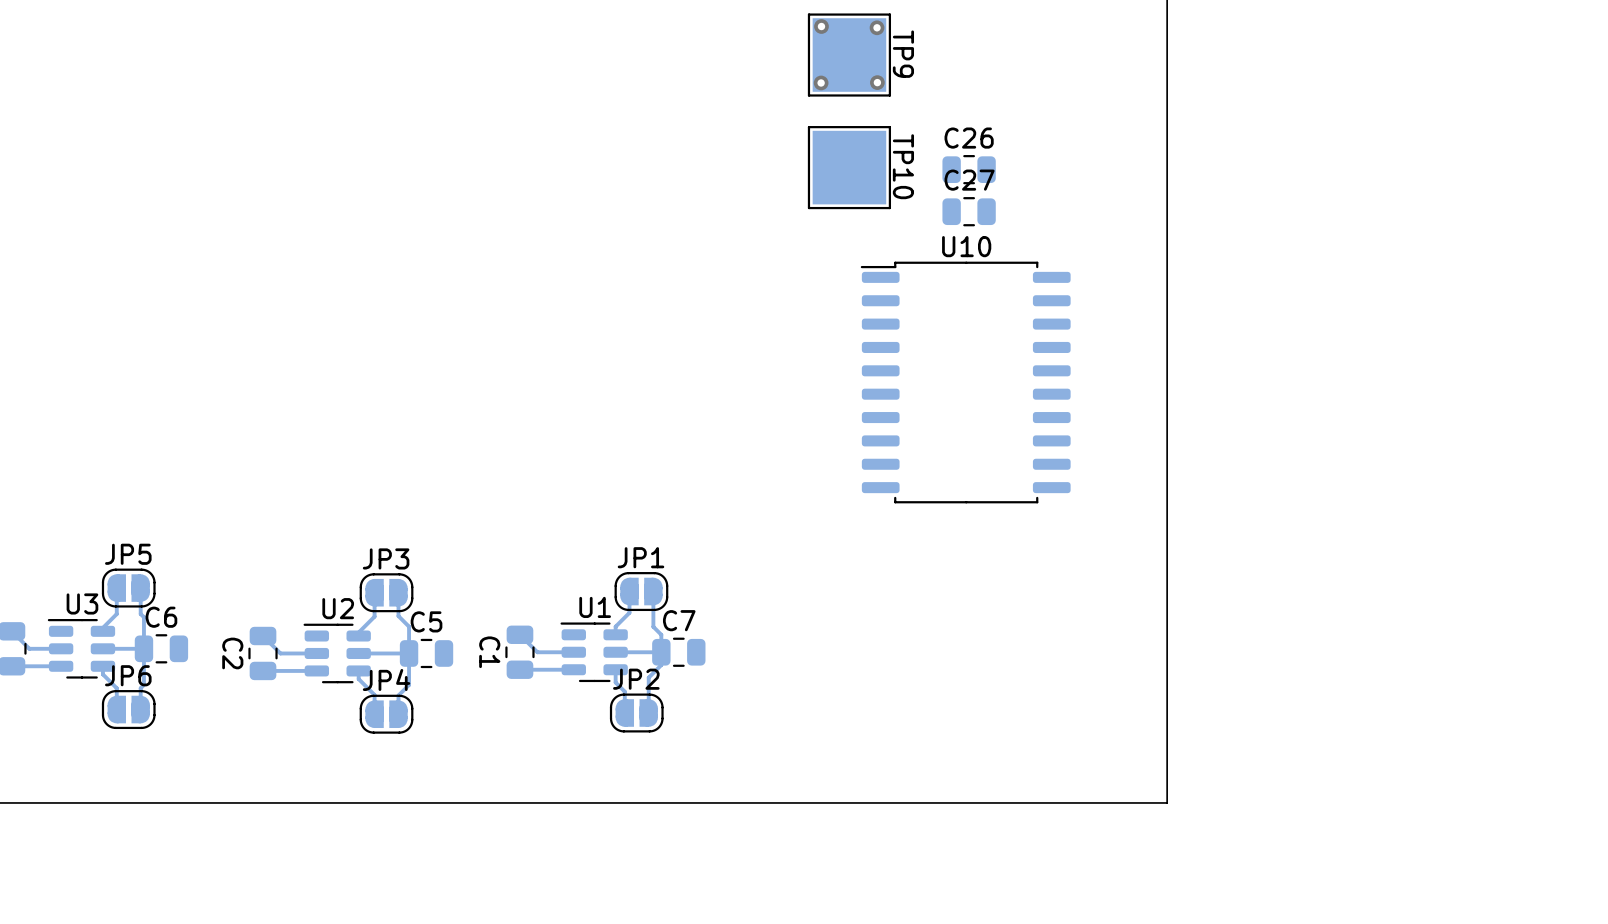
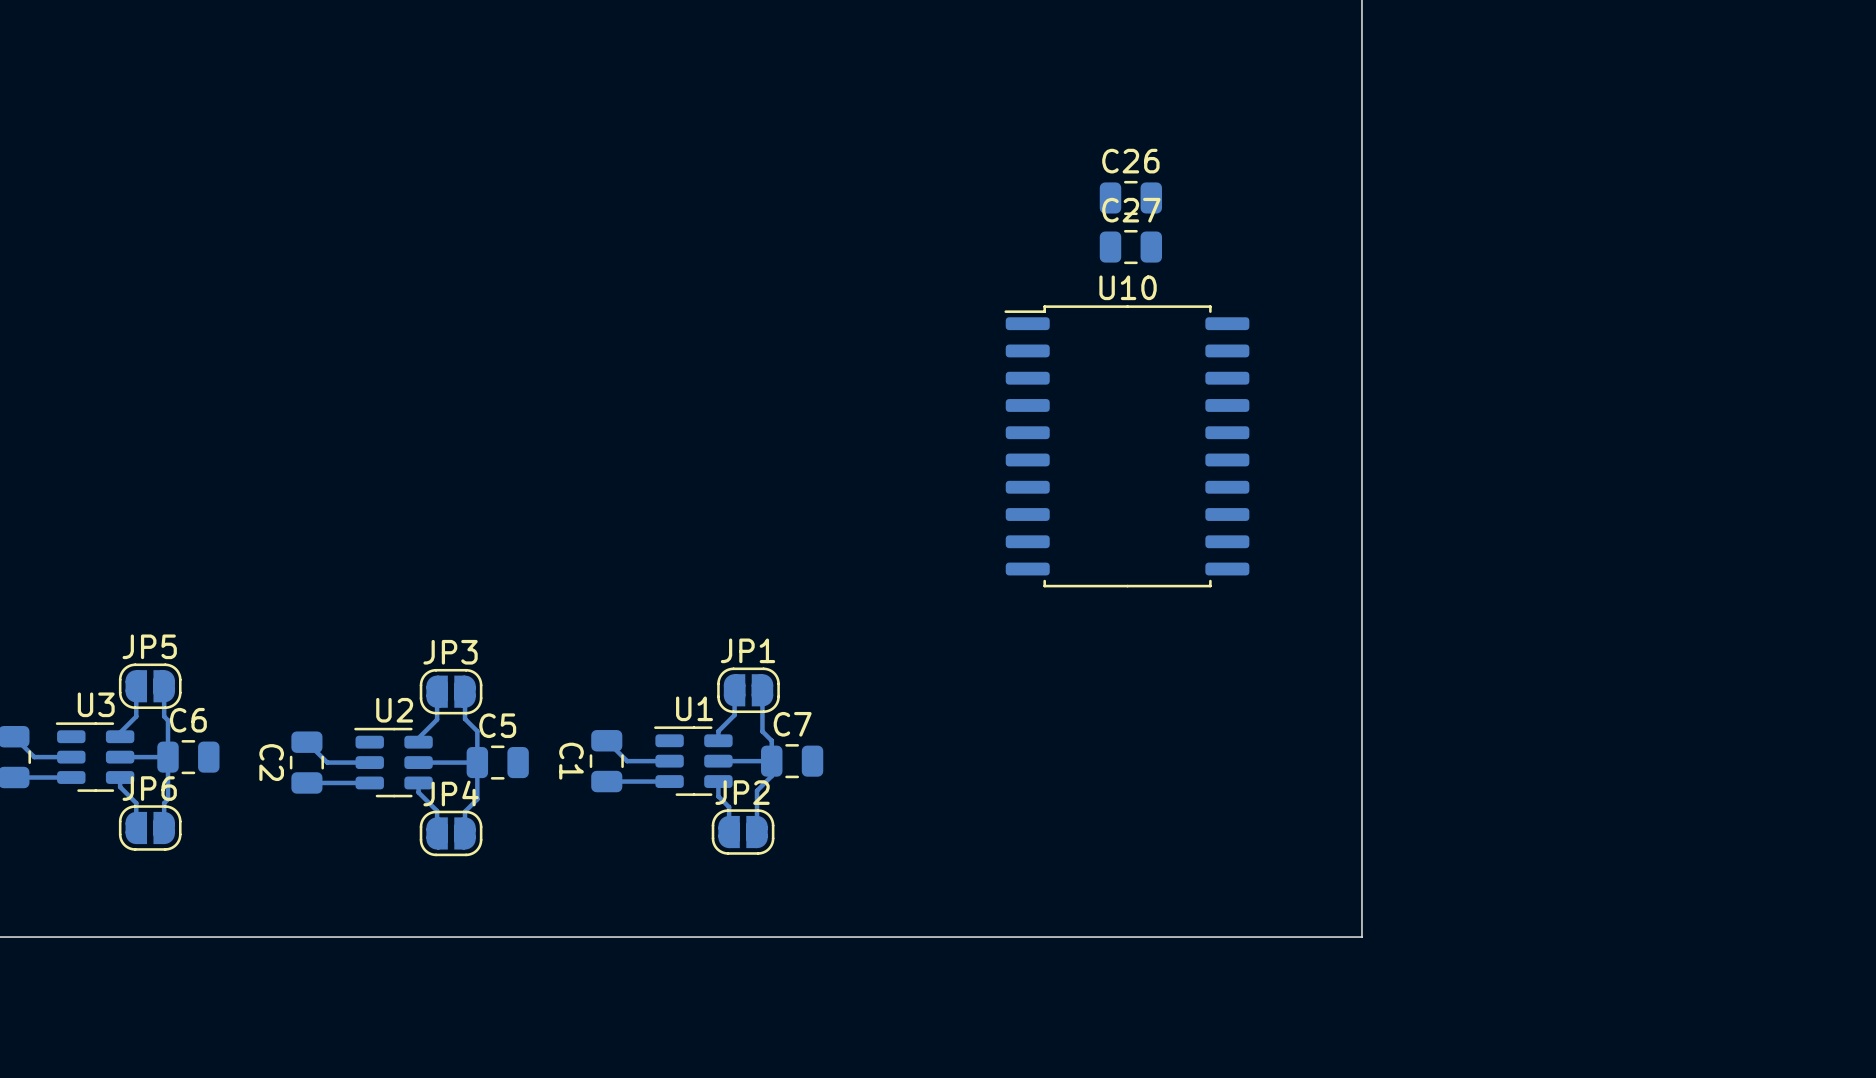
via: (821, 26) -> none
via: (877, 27) -> none
TP9: (849, 55) -> none
via: (821, 82) -> none
via: (877, 82) -> none
TP10: (849, 167) -> none

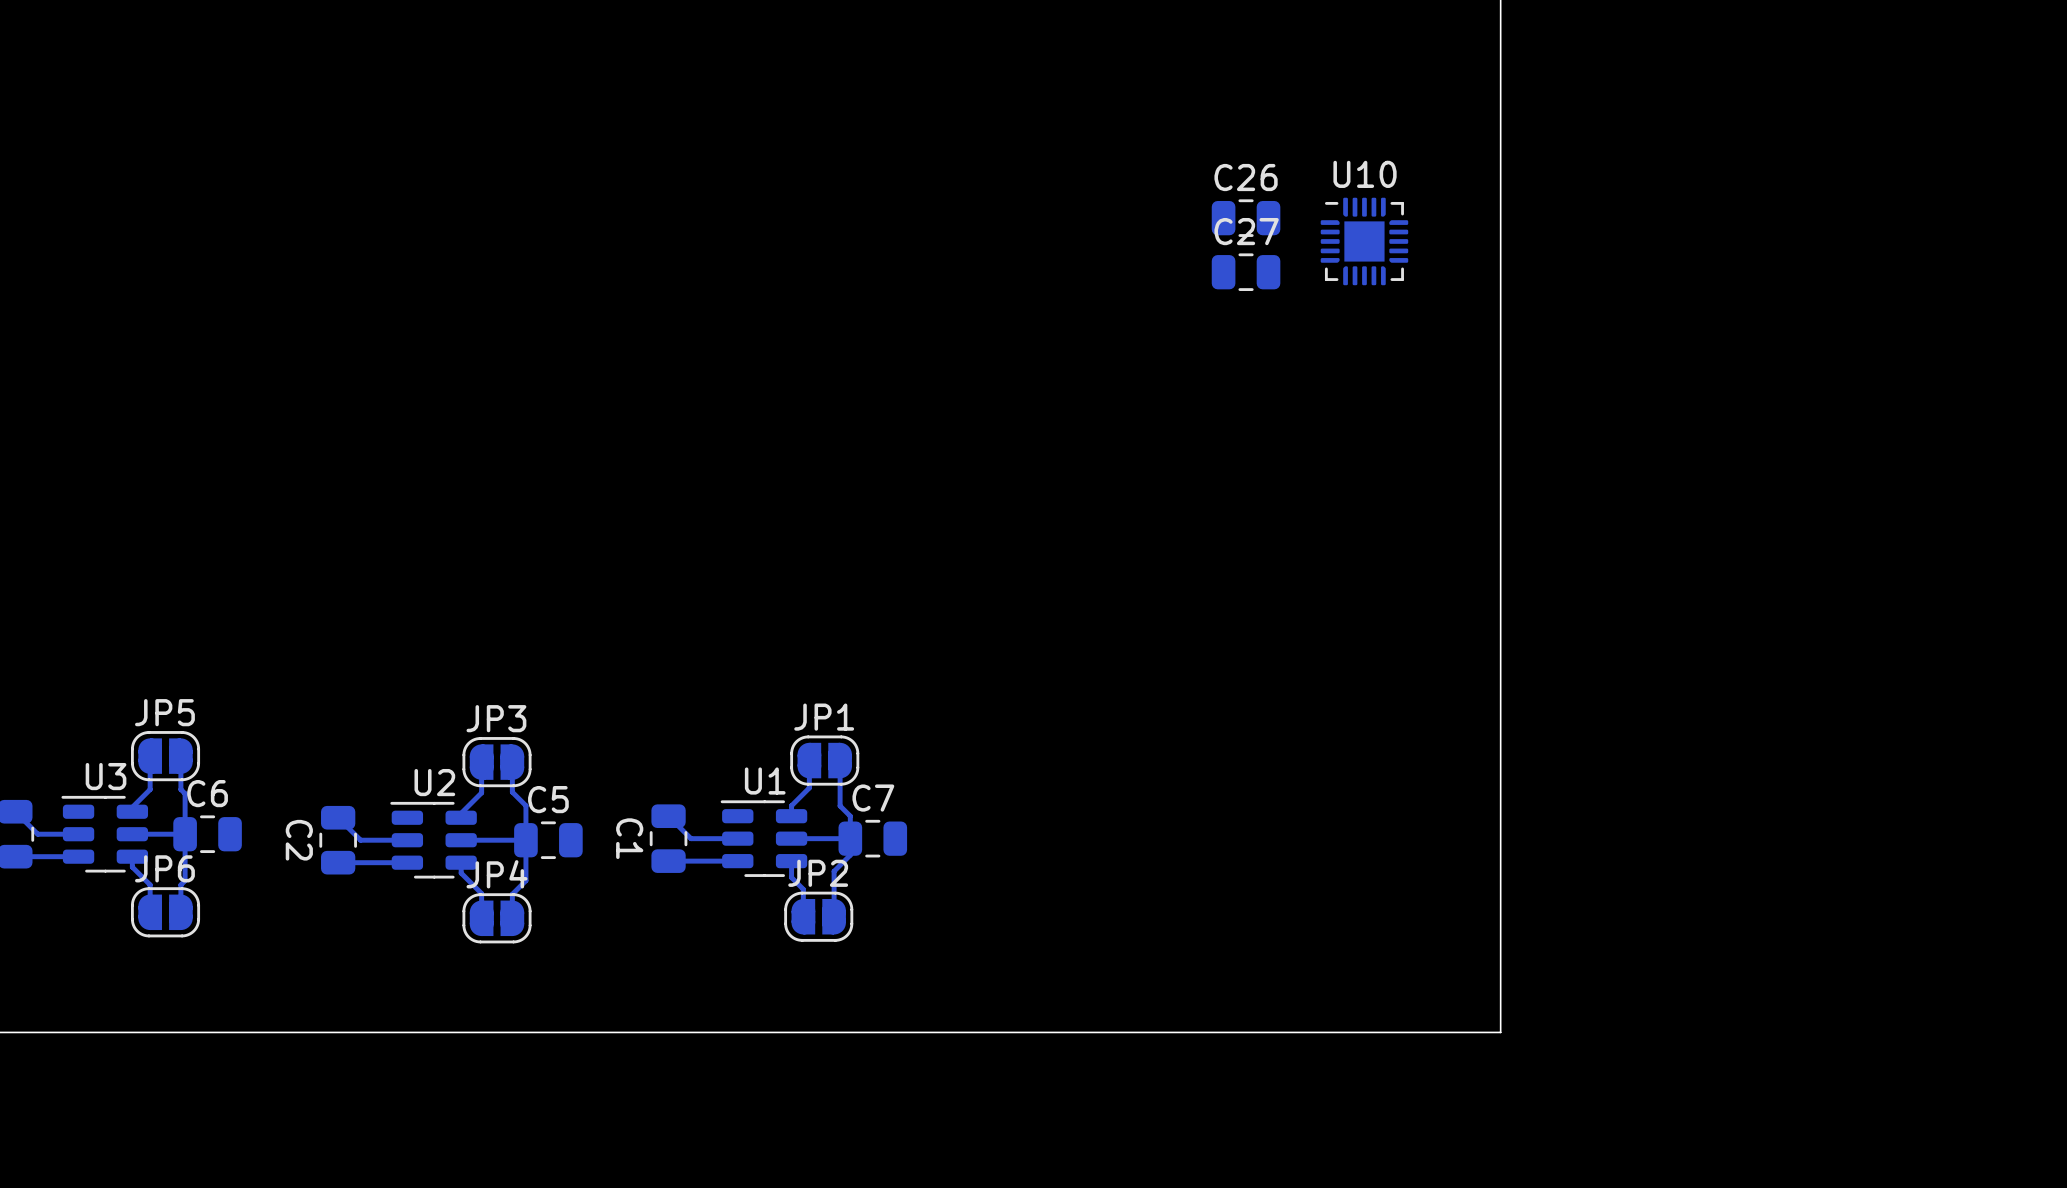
U10 name position: U10 (1128, 287) -> U10 (1365, 174)
U10 footprint: [1004, 305, 1250, 588] -> [1320, 197, 1409, 286]

